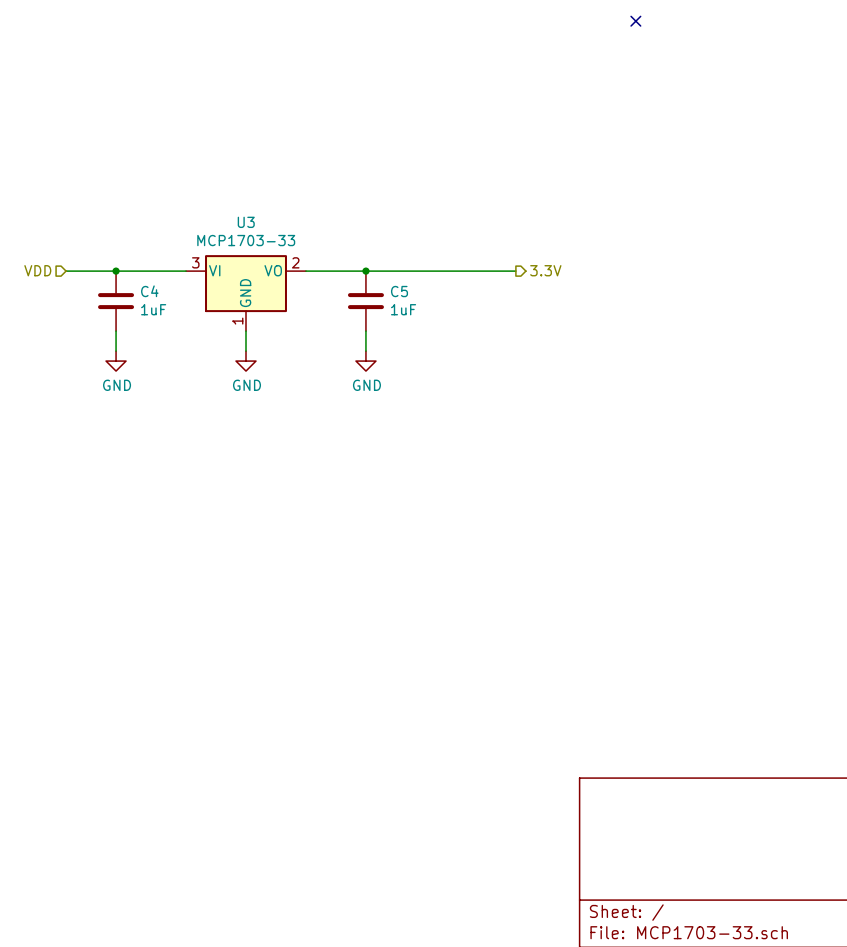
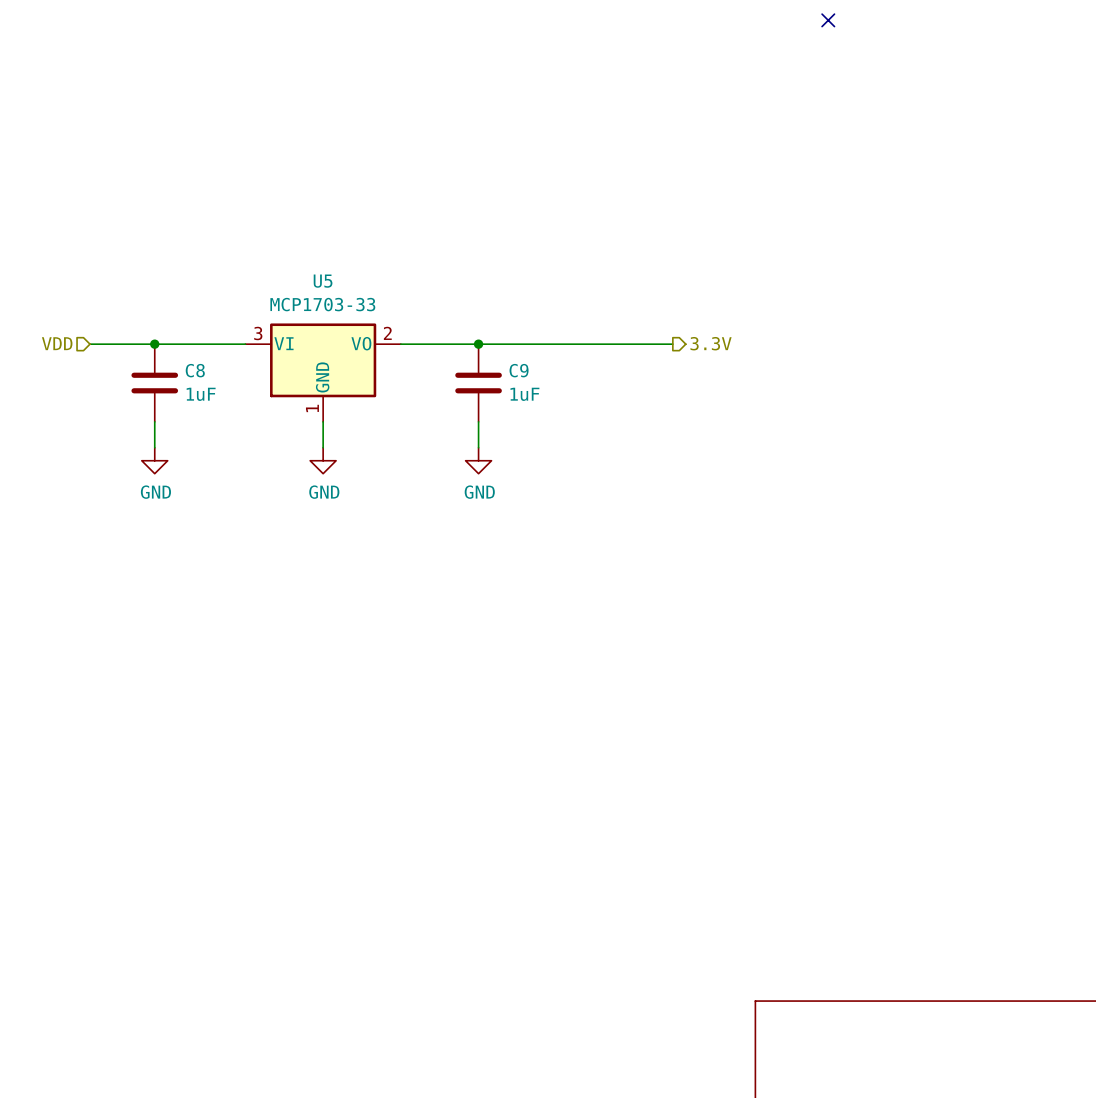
U3 name: U3 (246, 222) -> U5 (323, 281)
C4 name: C4 (149, 291) -> C8 (195, 370)
C5 name: C5 (399, 291) -> C9 (519, 370)

